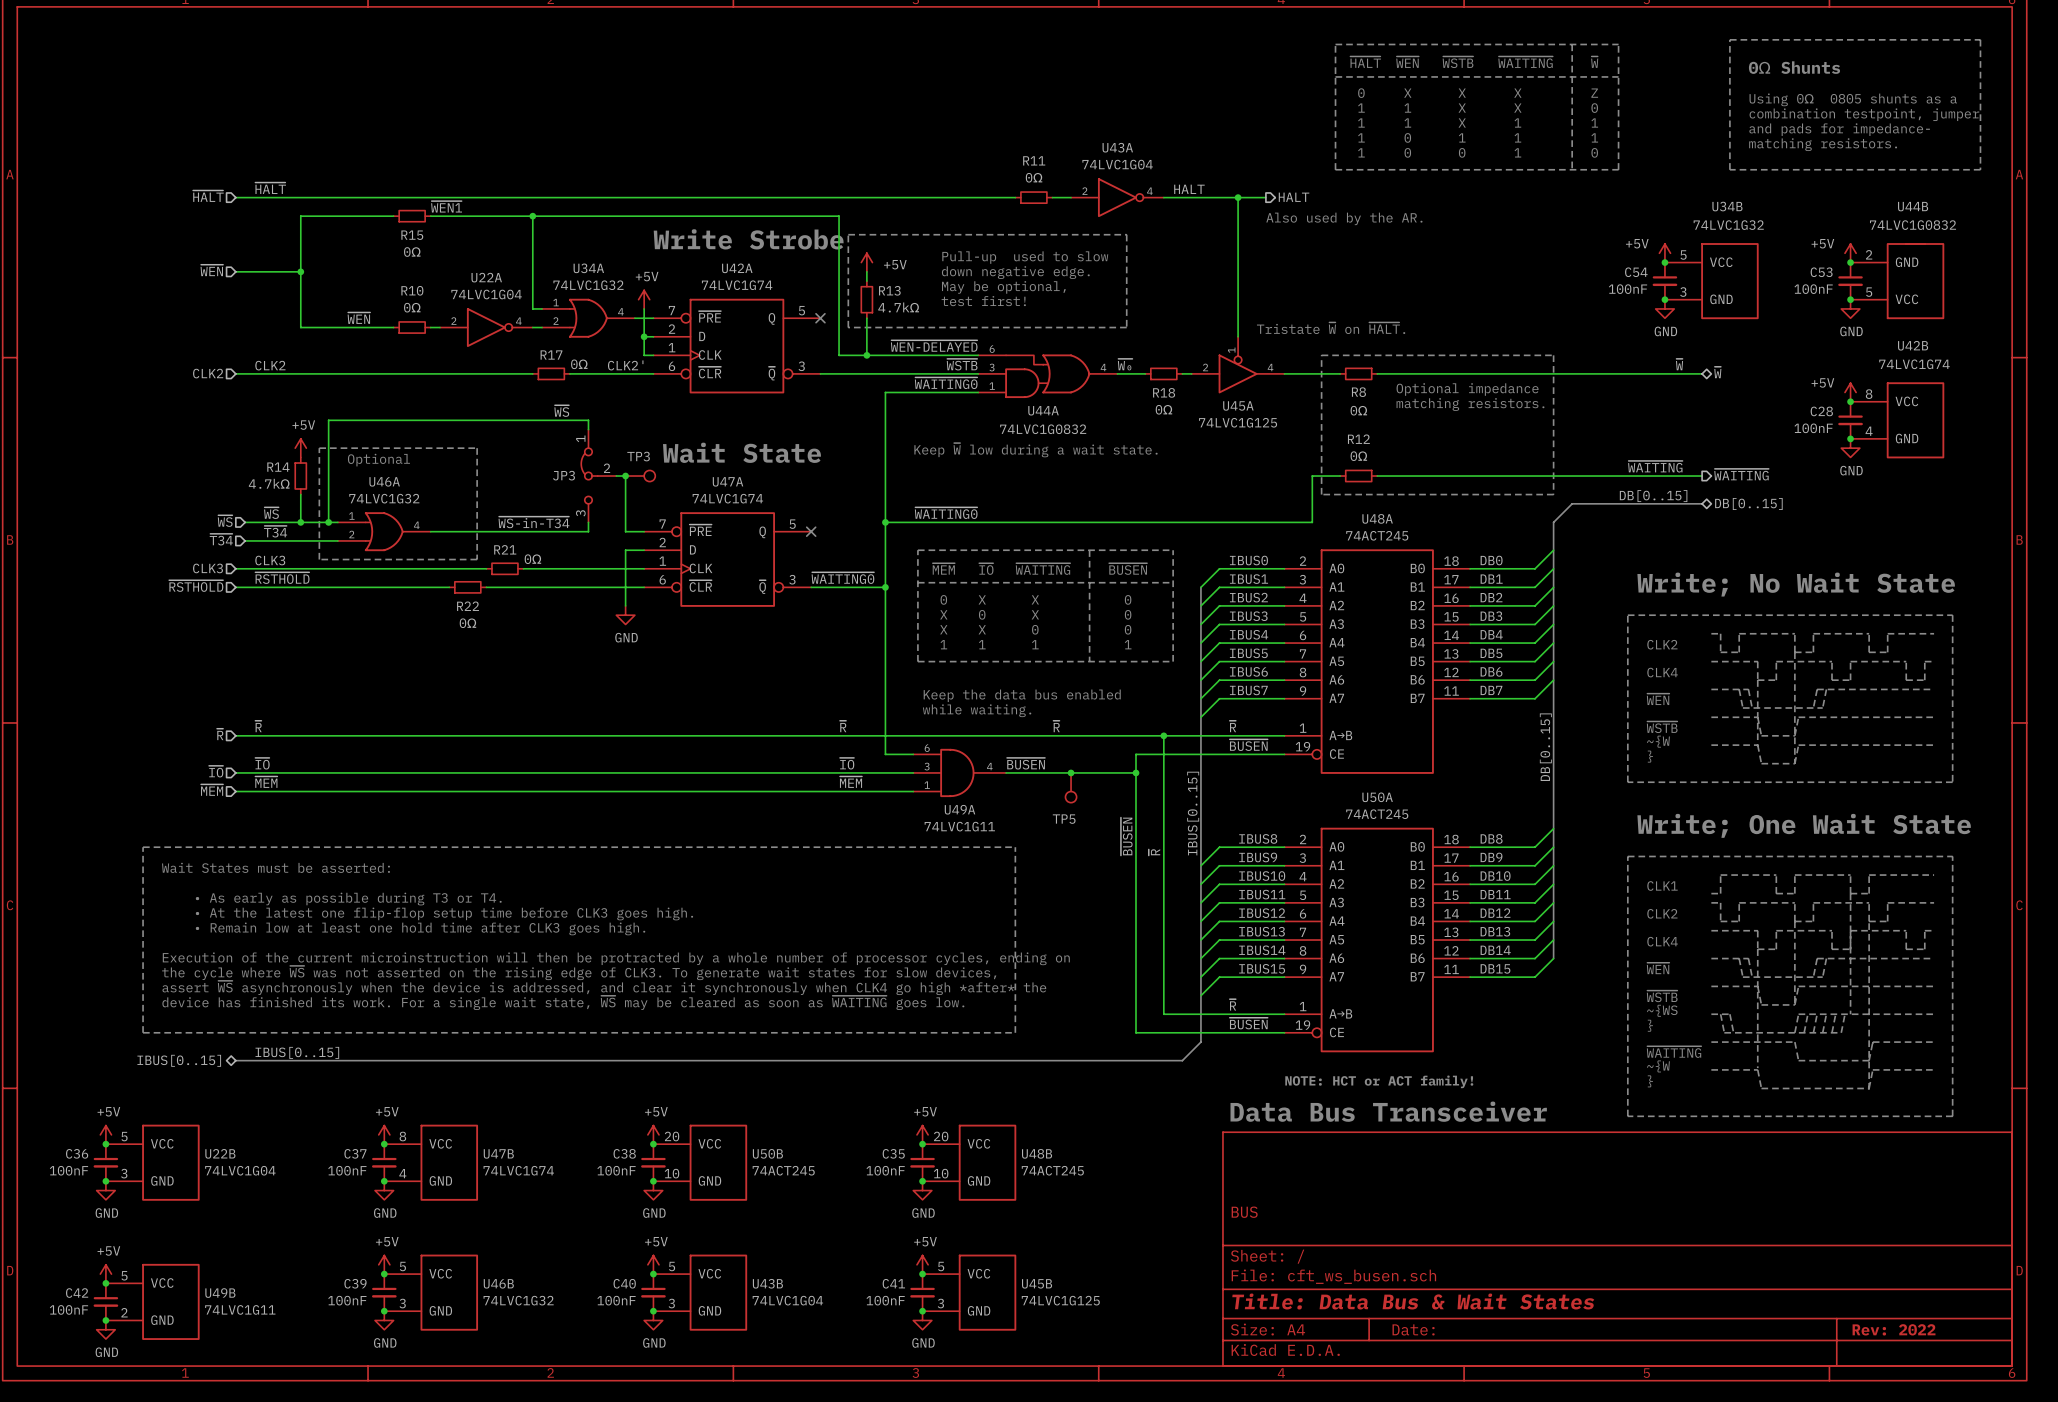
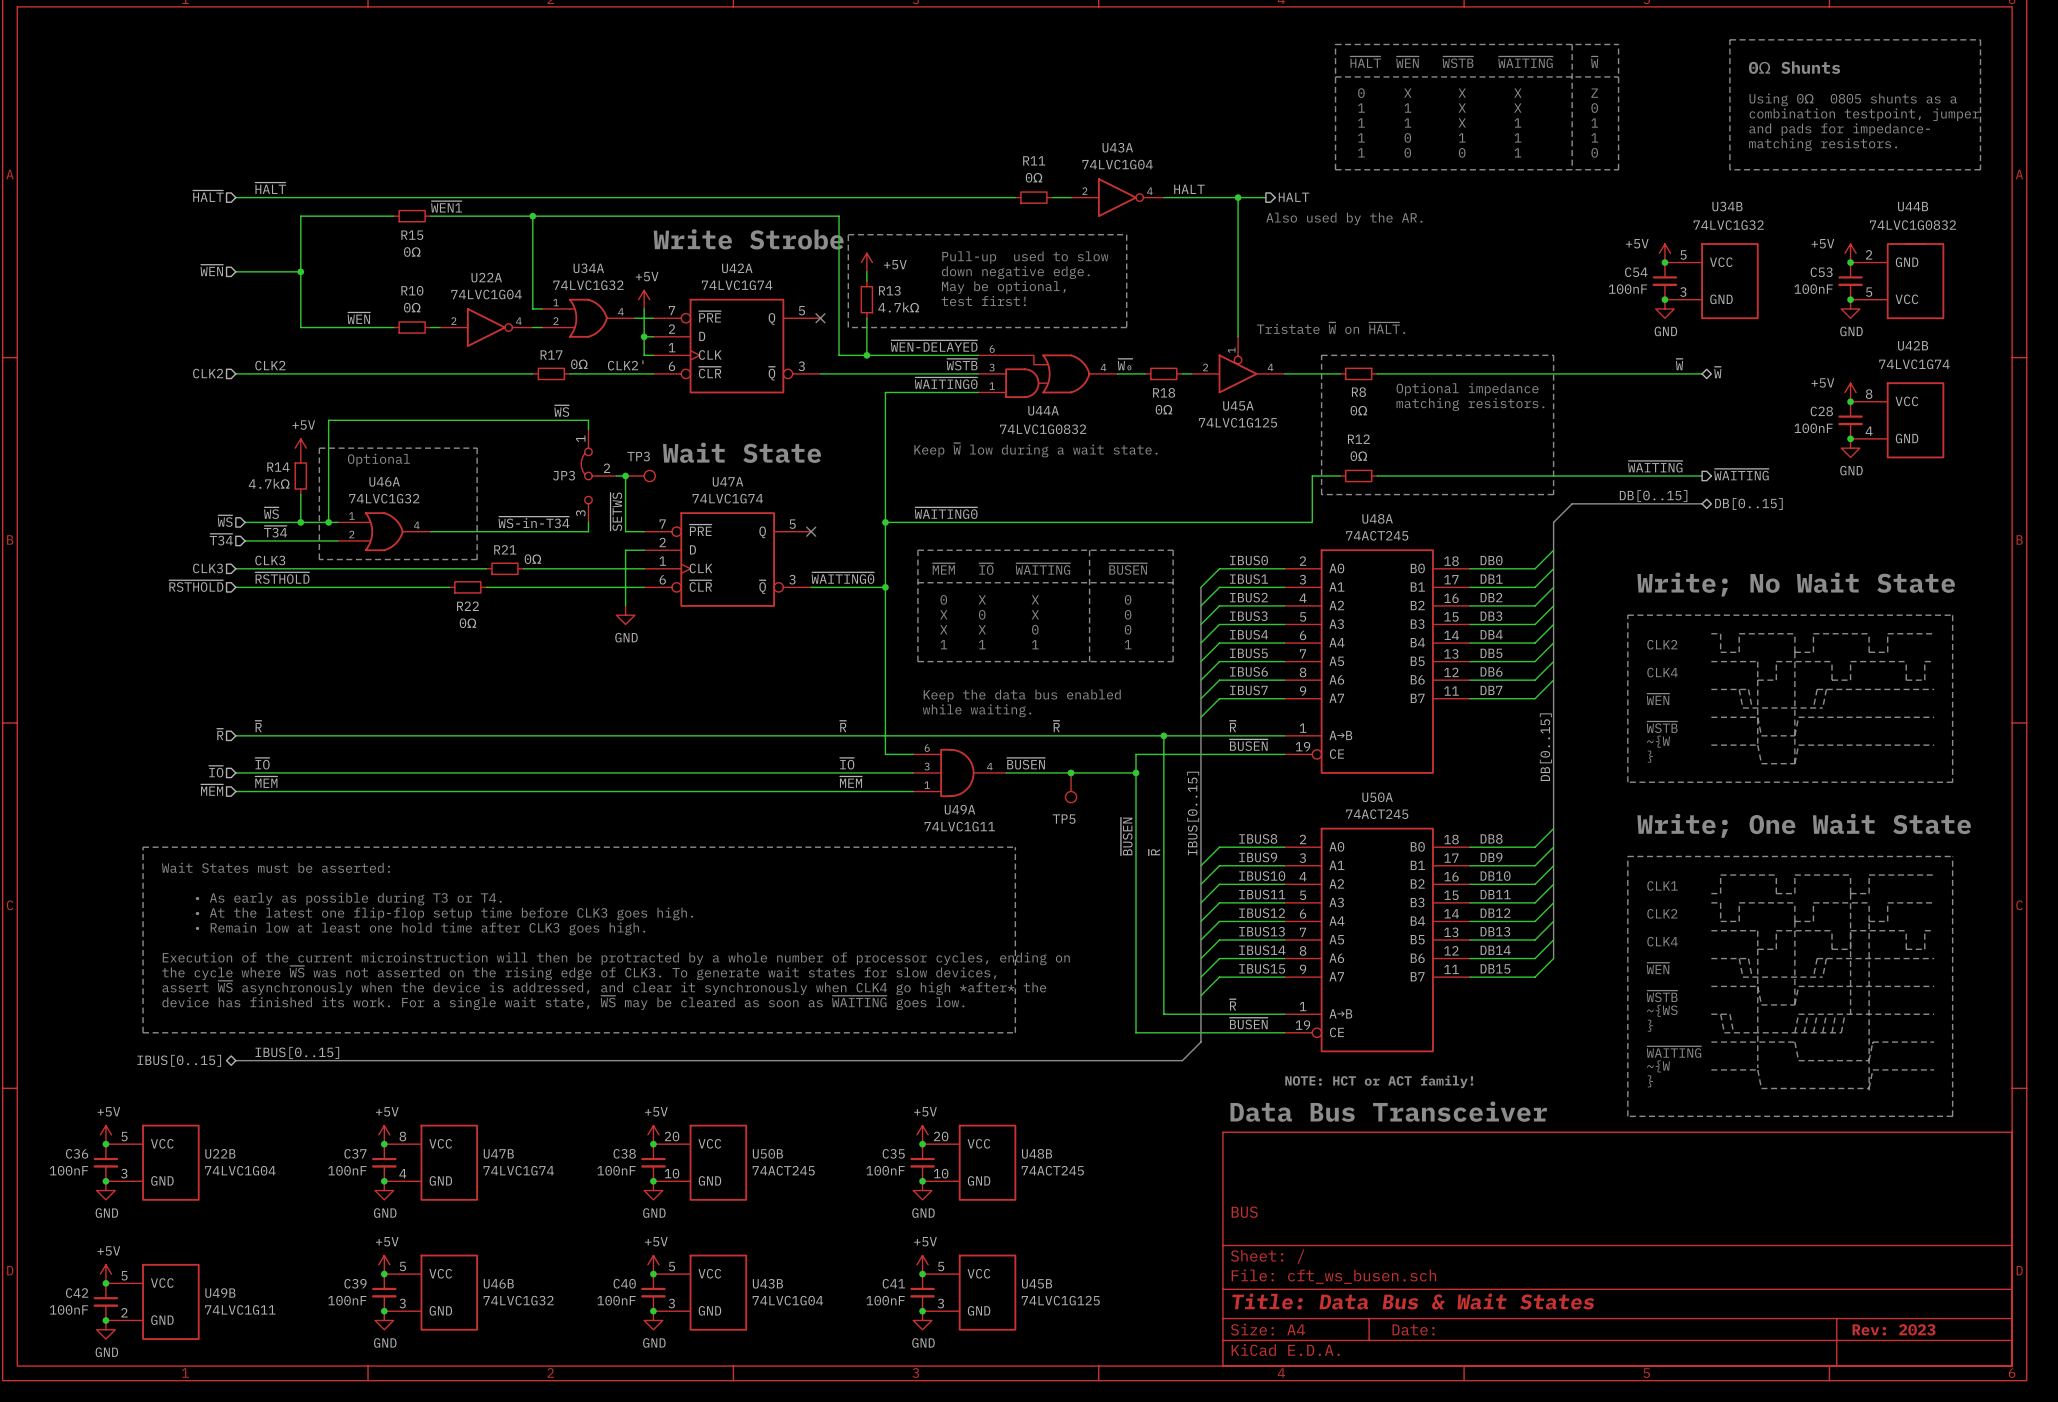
label: none -> ~{SETWS} (616, 511)
title block: Rev: 2022 (1894, 1329) -> Rev: 2023 (1894, 1329)

